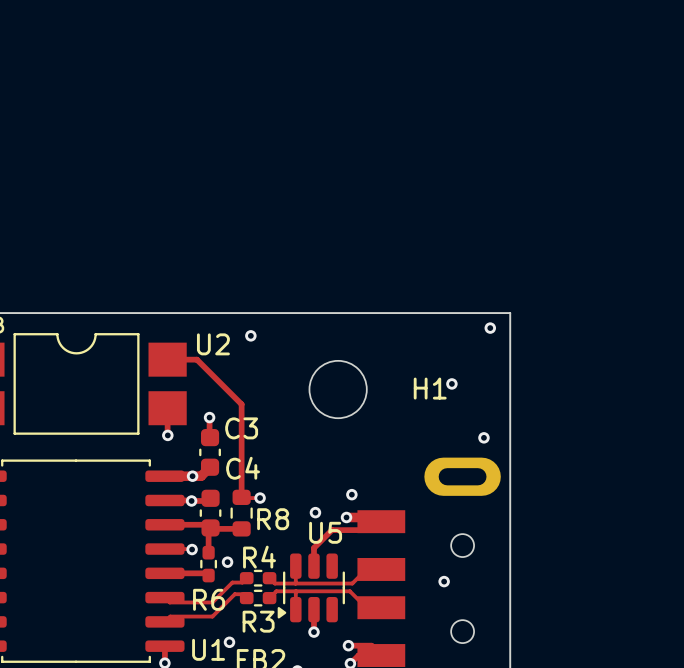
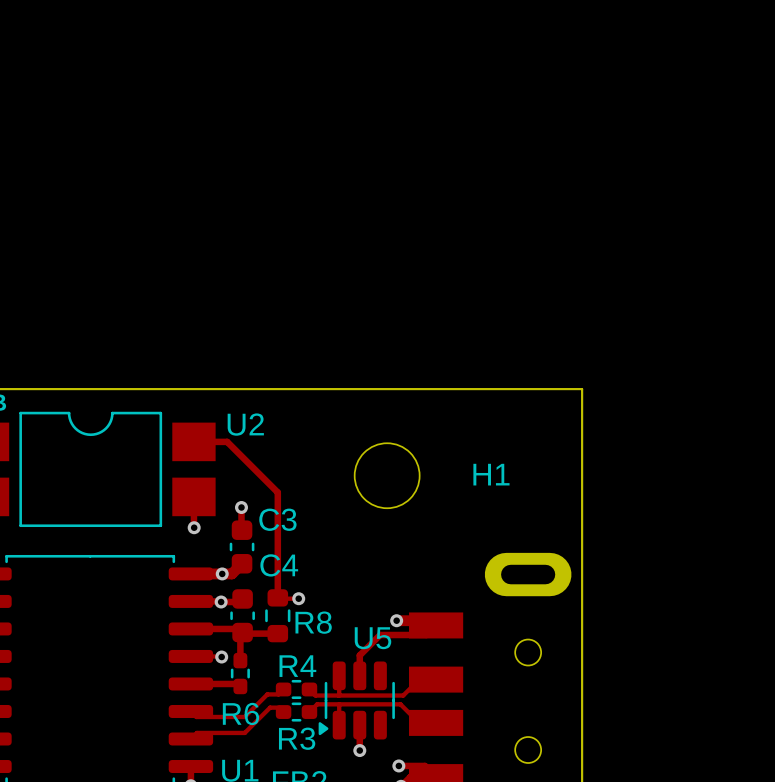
via: (490, 328) -> none
via: (250, 335) -> none
via: (451, 383) -> none
via: (483, 437) -> none
via: (351, 494) -> none
via: (315, 512) -> none
via: (227, 562) -> none
via: (444, 581) -> none
via: (229, 642) -> none

